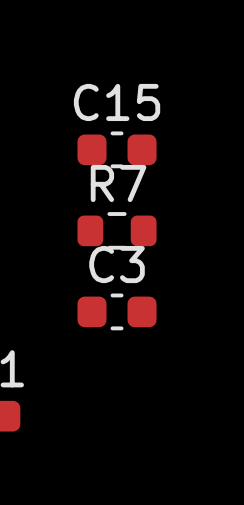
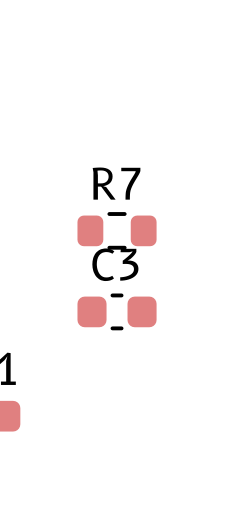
C15: (117, 149) -> none

